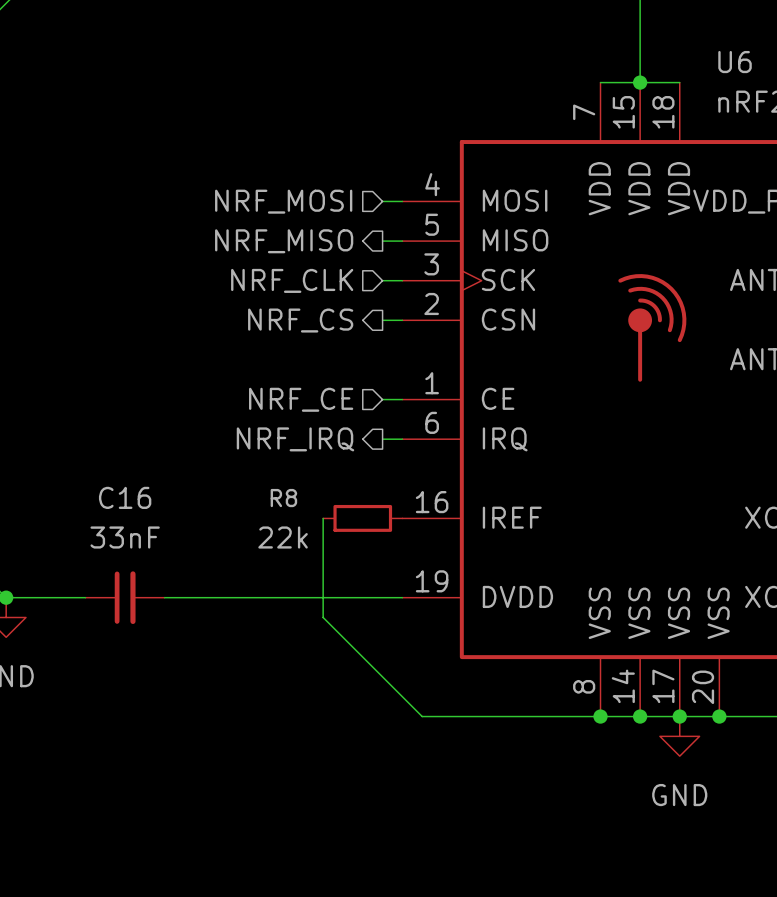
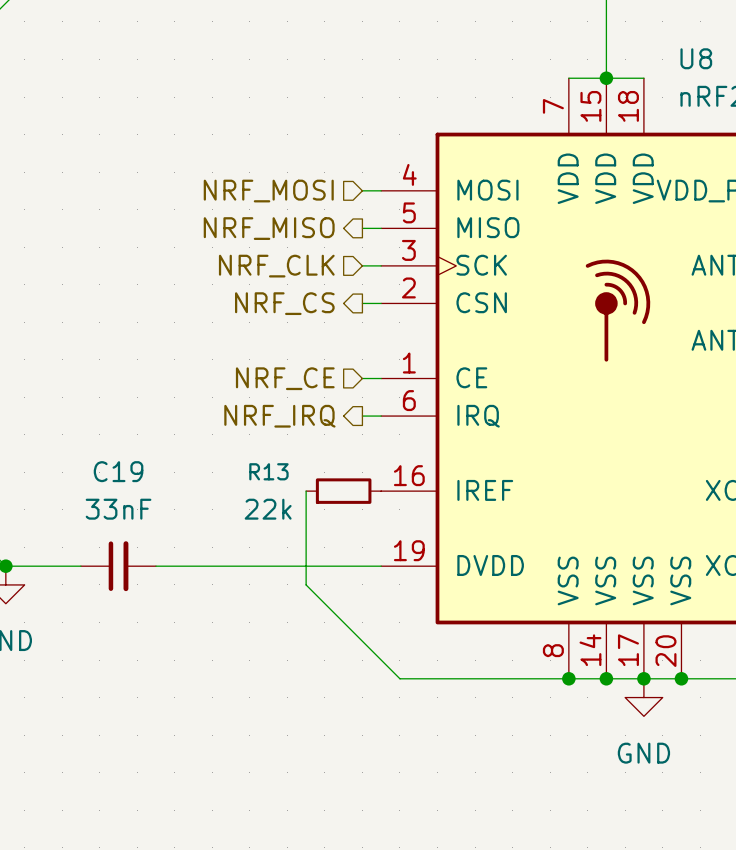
U6 name: U6 (735, 62) -> U8 (696, 58)
C16 name: C16 (125, 497) -> C19 (118, 471)
R8 name: R8 (283, 498) -> R13 (268, 471)

